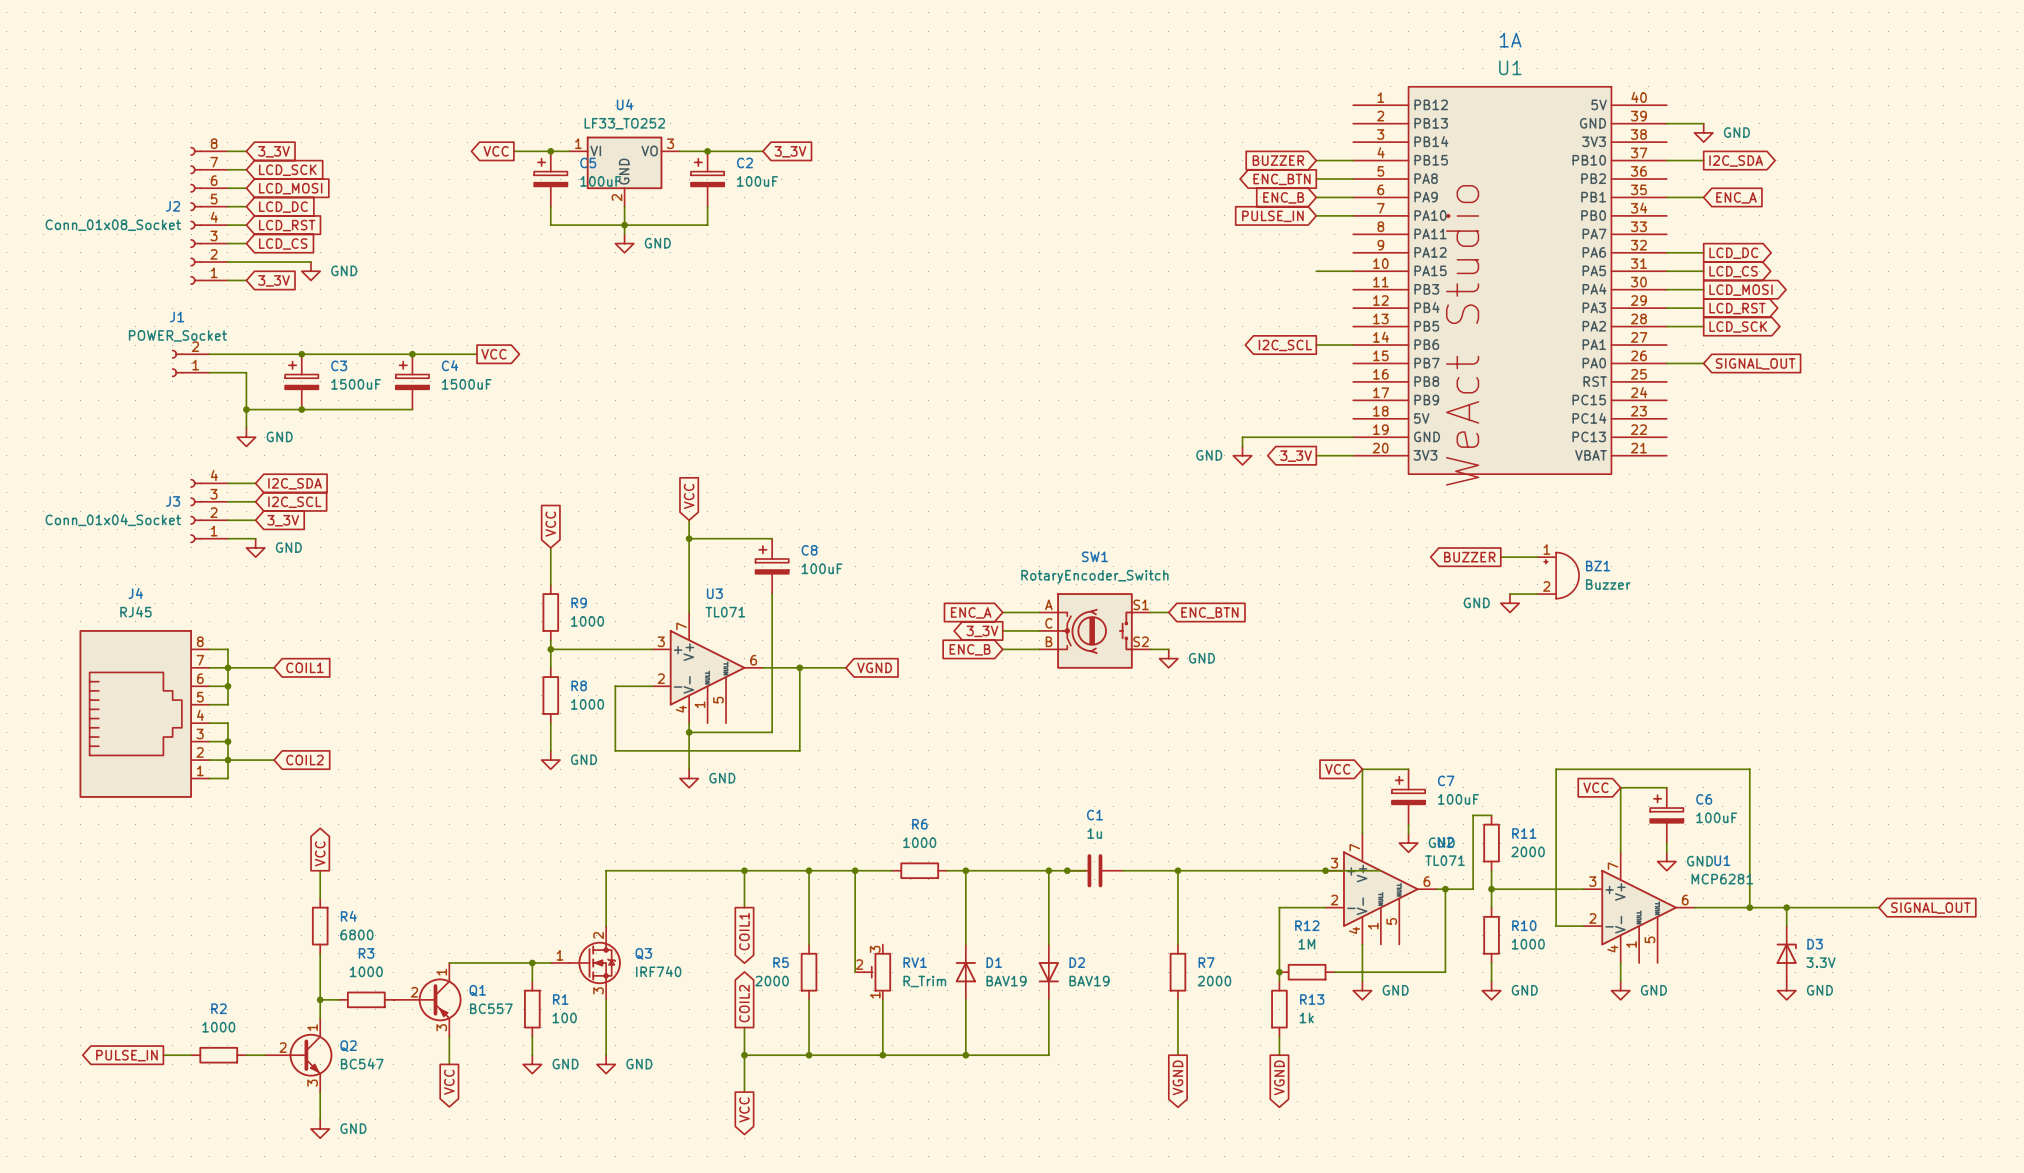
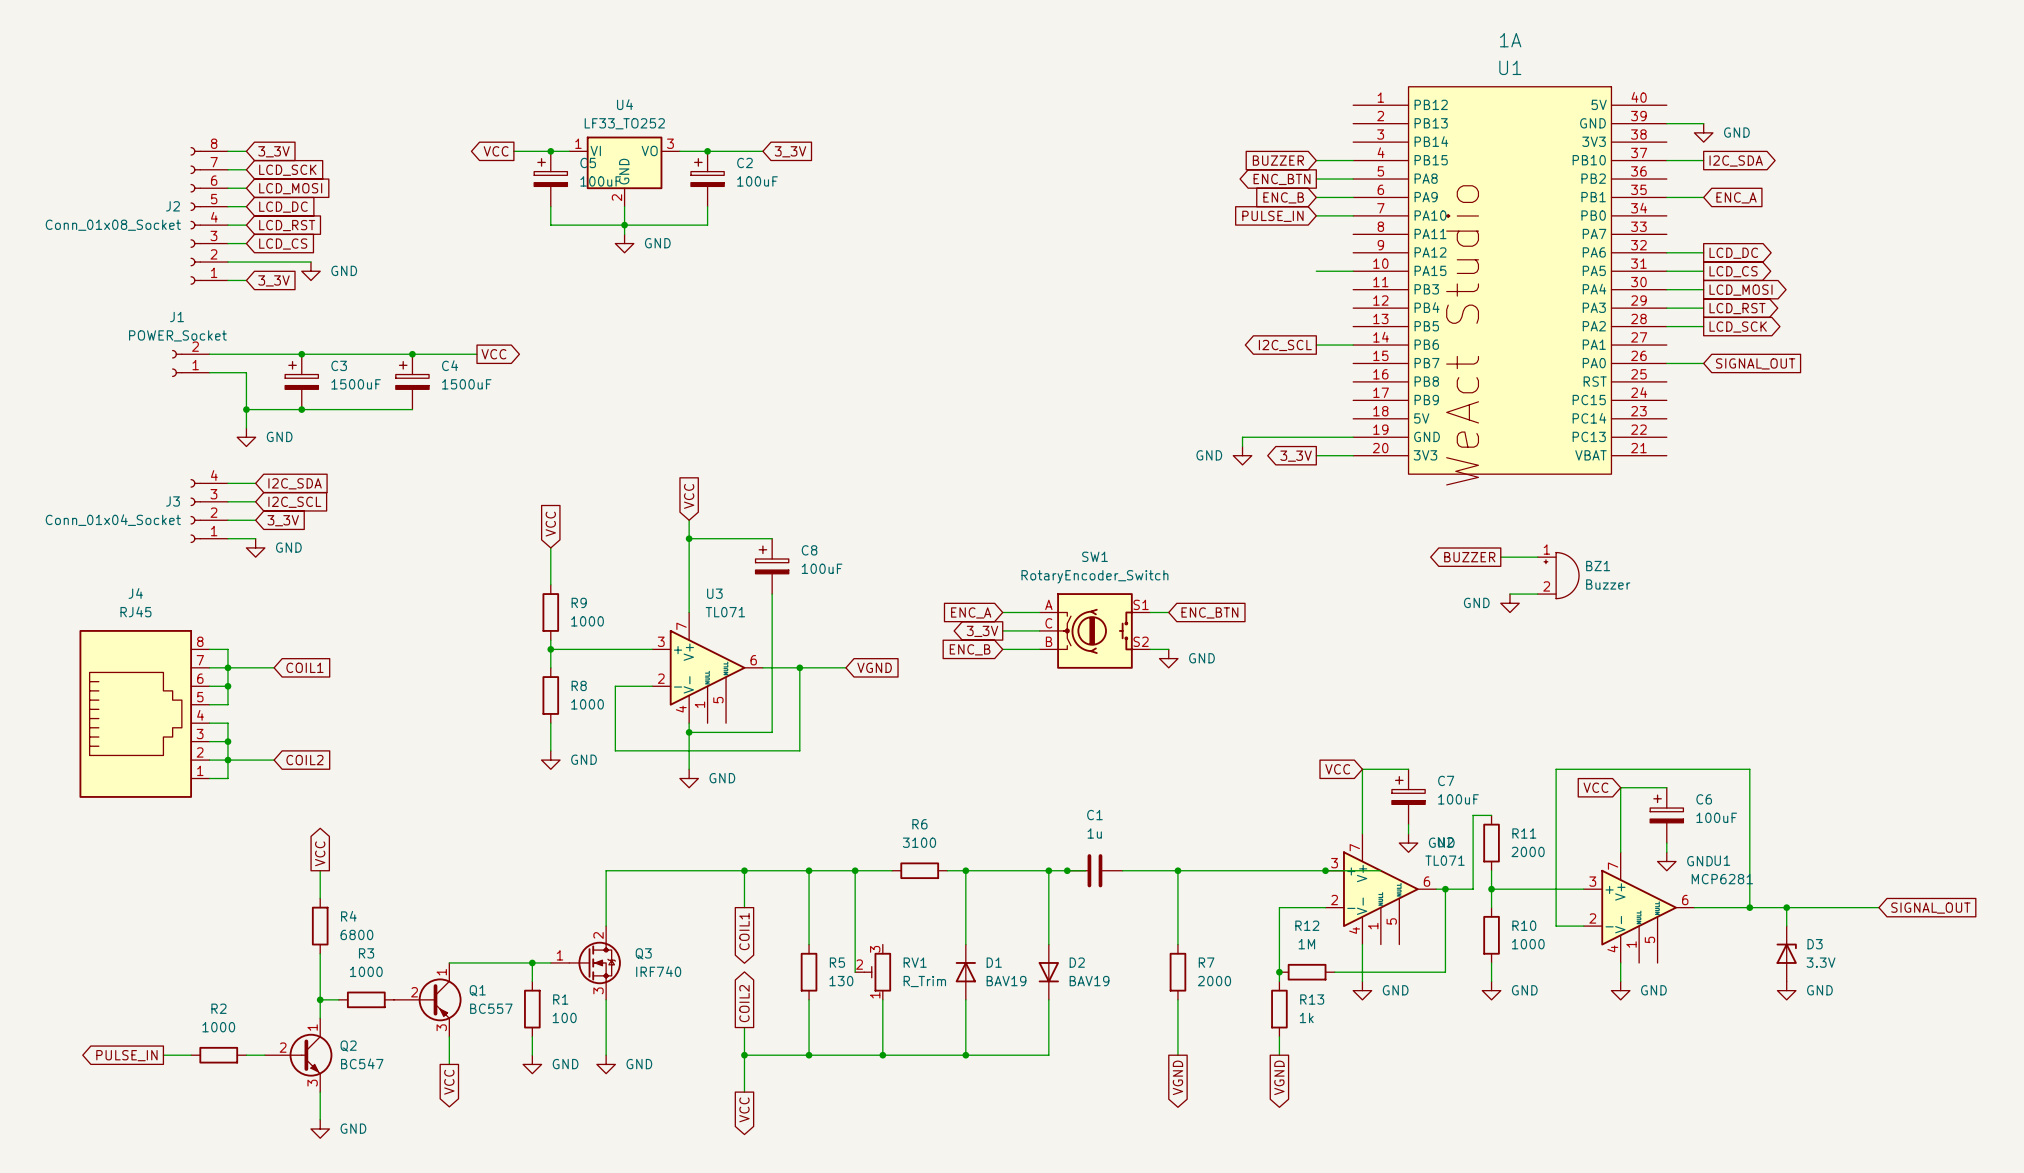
R6 value: 1000 (919, 842) -> 3100 (919, 842)
R5 name position: R5 (781, 962) -> R5 (837, 962)
R5 value: 2000 (772, 981) -> 130 (841, 981)

